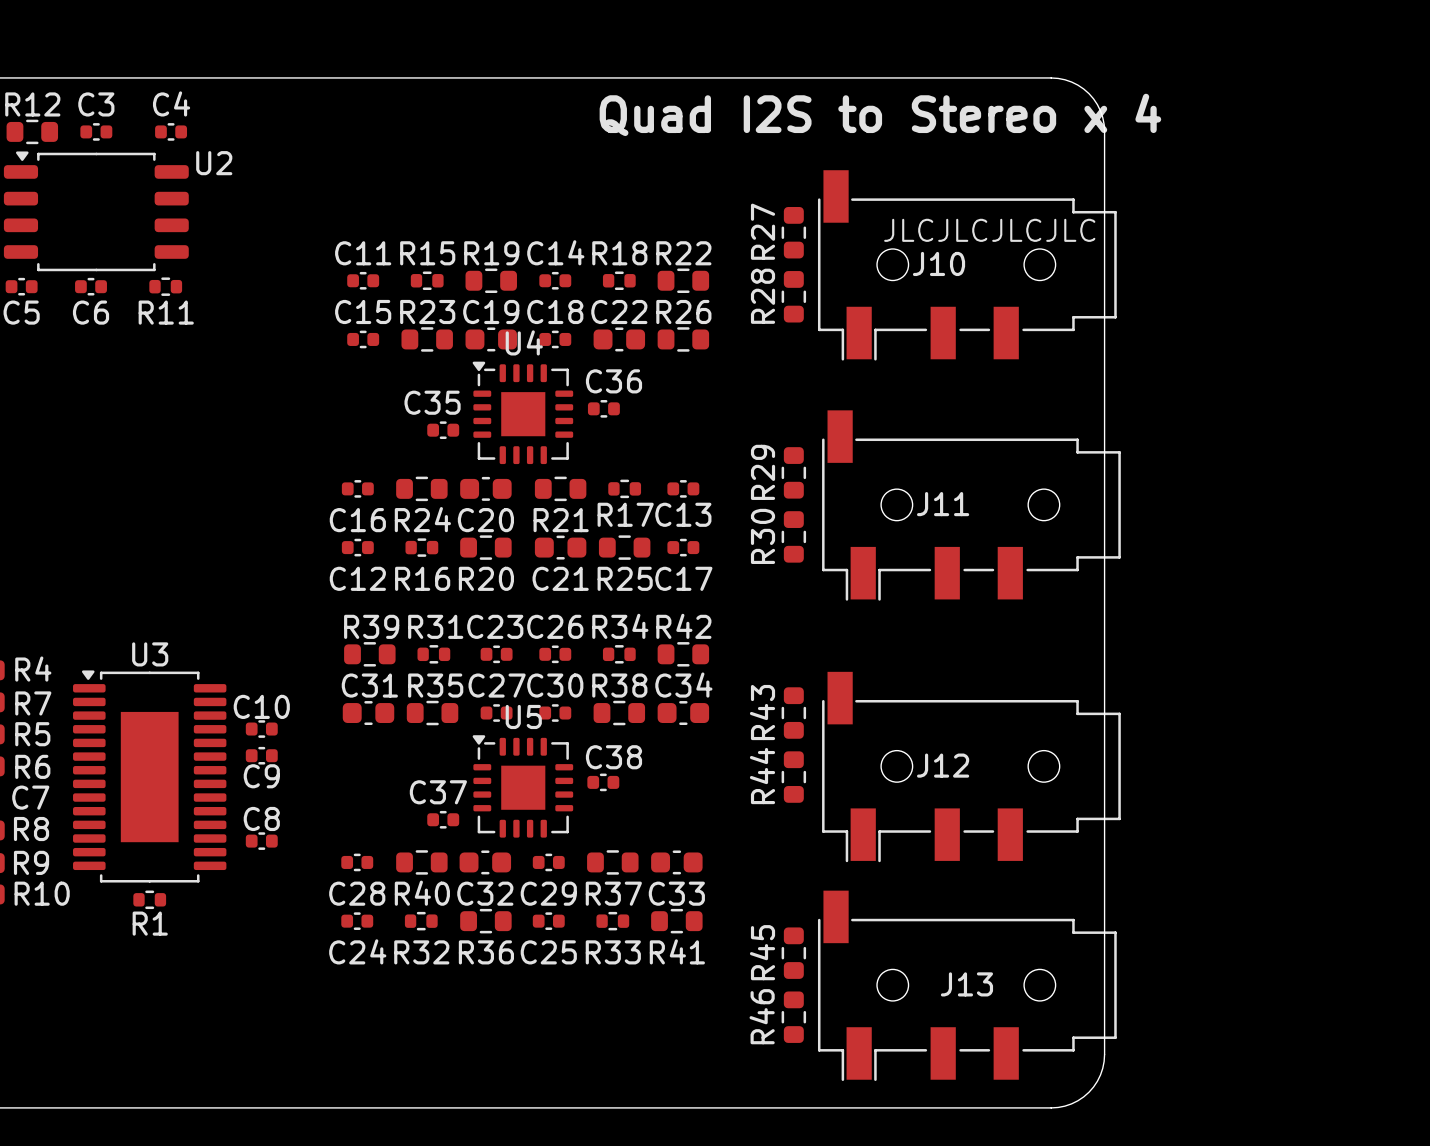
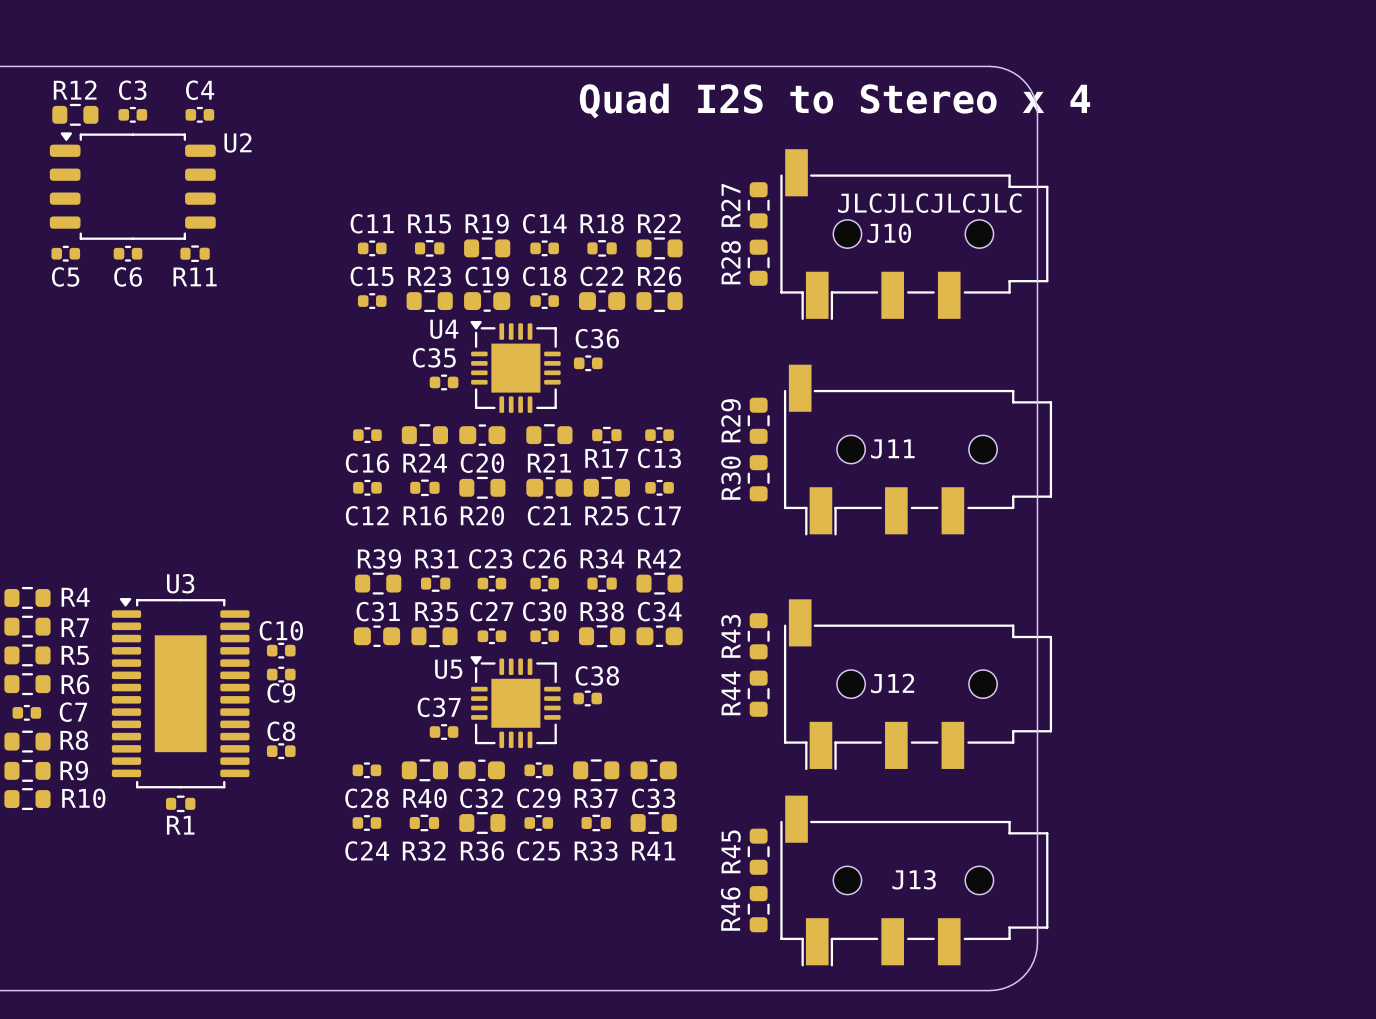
U4 name position: U4 (524, 342) -> U4 (444, 329)
U4 footprint: [472, 361, 574, 465] -> [470, 320, 561, 413]
U5 name position: U5 (523, 716) -> U5 (448, 669)
U5 footprint: [472, 735, 574, 838] -> [470, 656, 561, 749]

